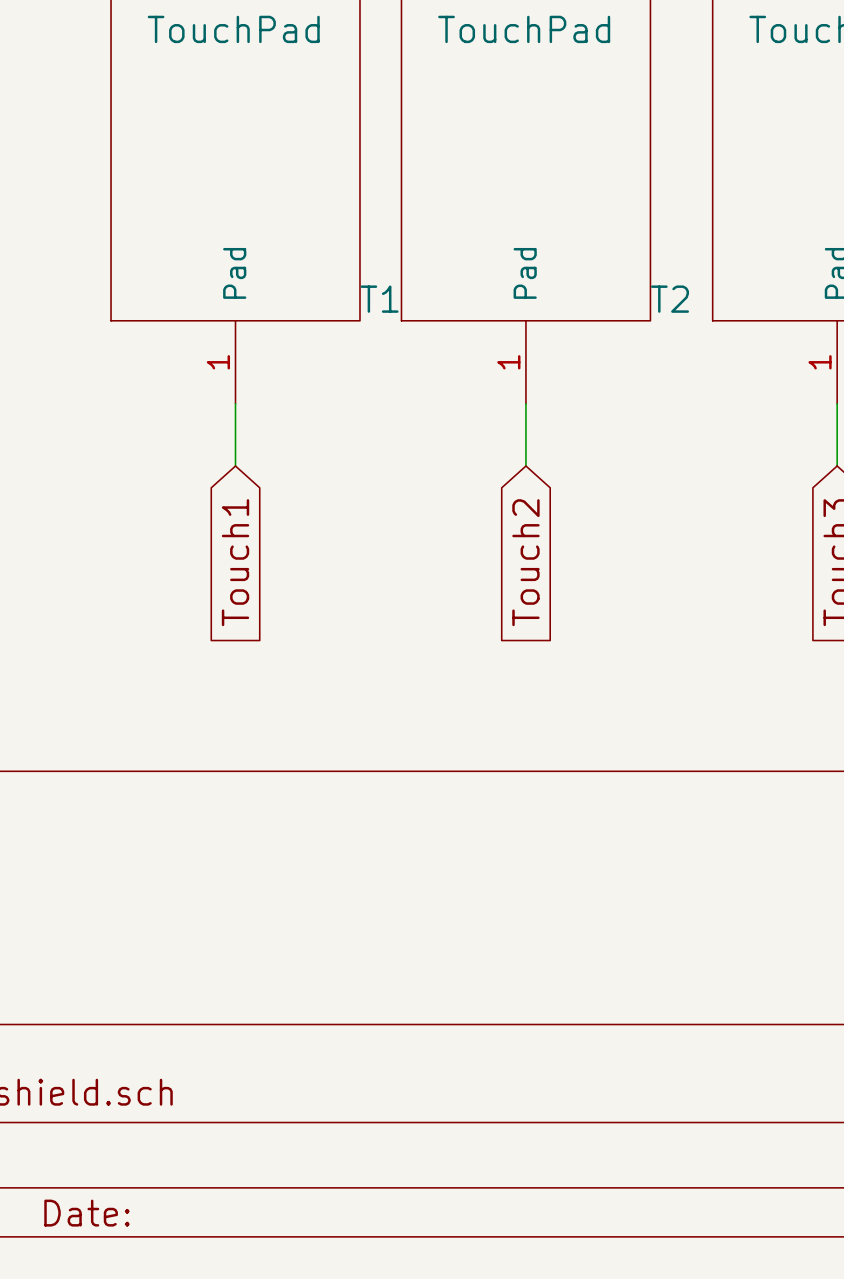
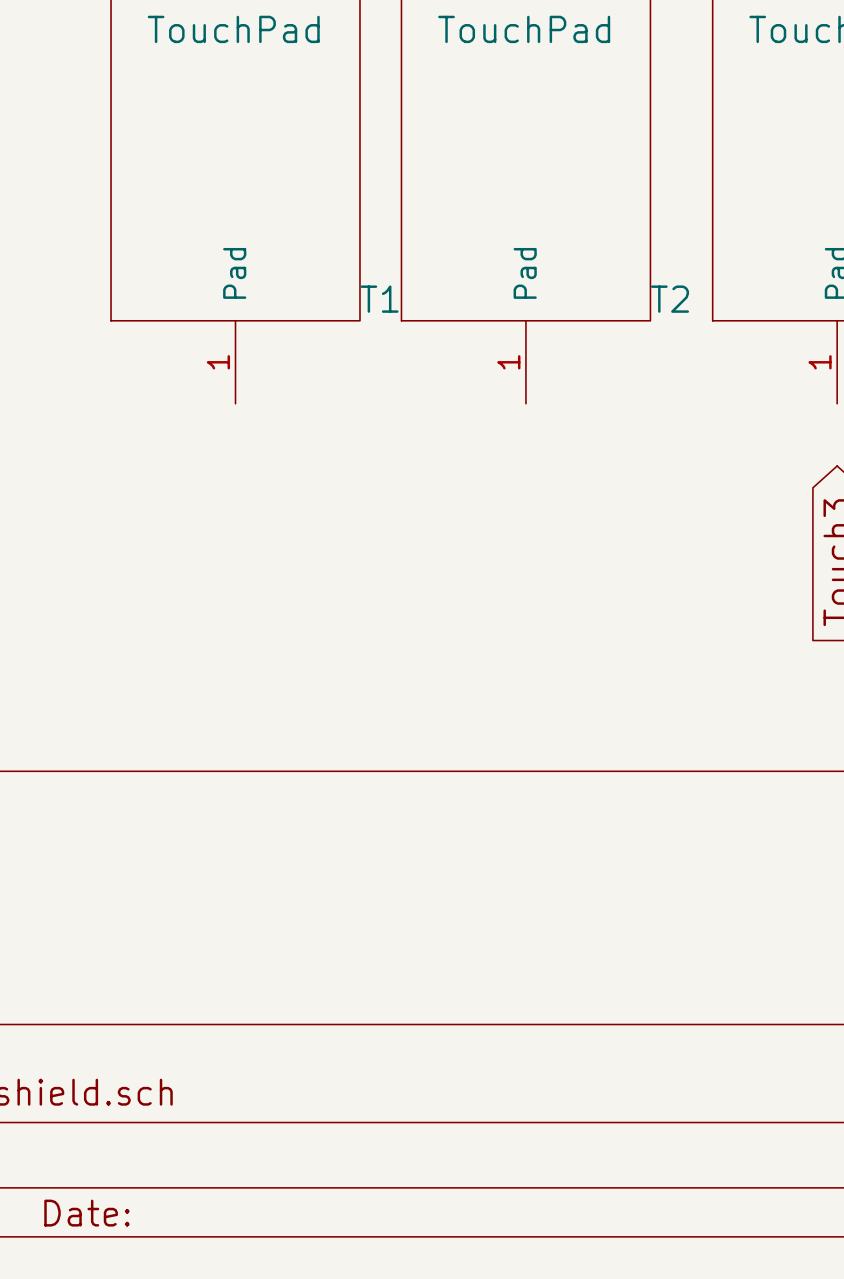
wire: (235, 403) (235, 466) -> none
wire: (525, 403) (525, 466) -> none
wire: (837, 403) (837, 466) -> none
global label: Touch1 (235, 562) -> none
global label: Touch2 (525, 562) -> none

